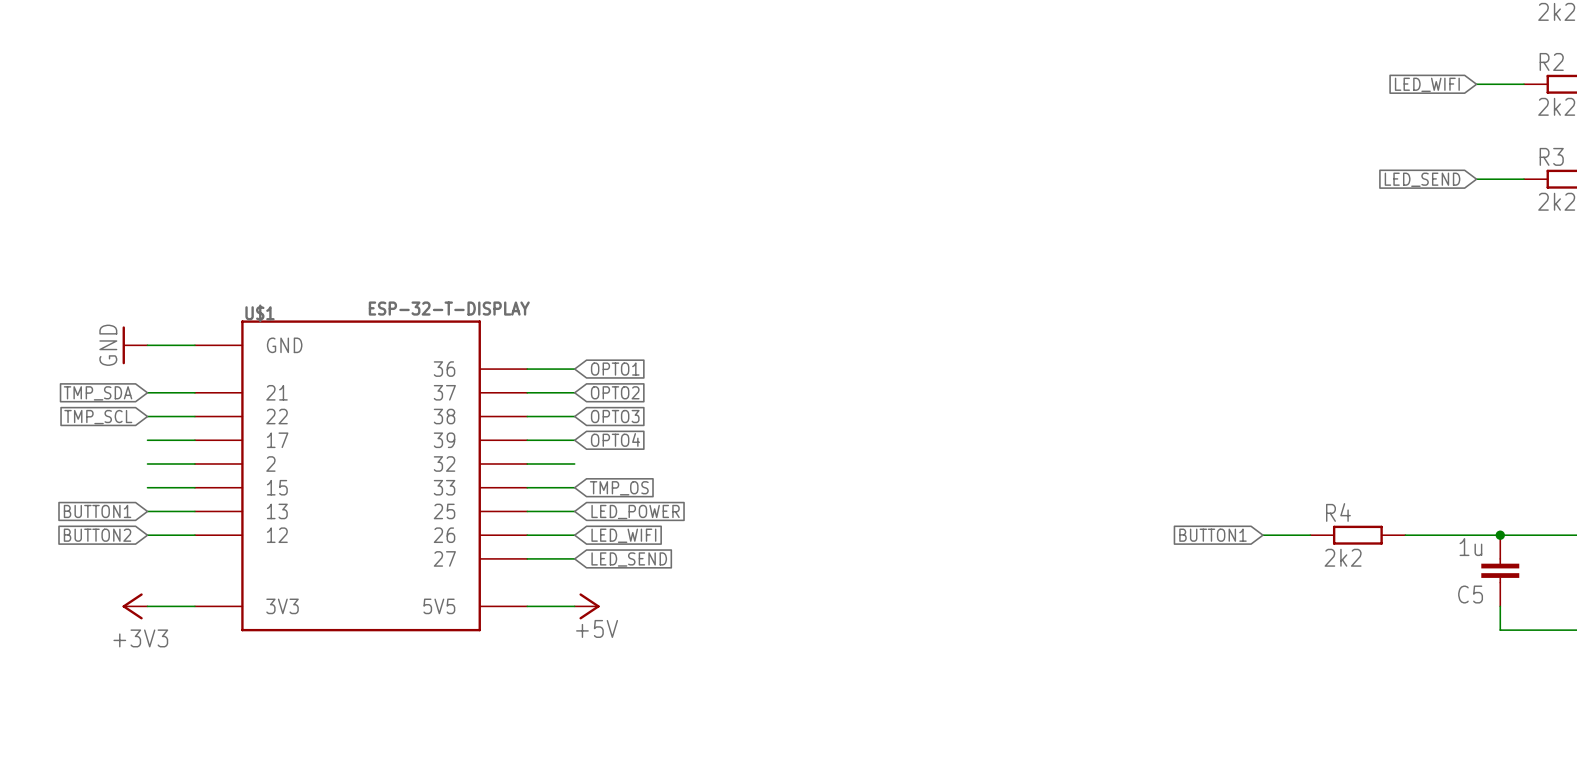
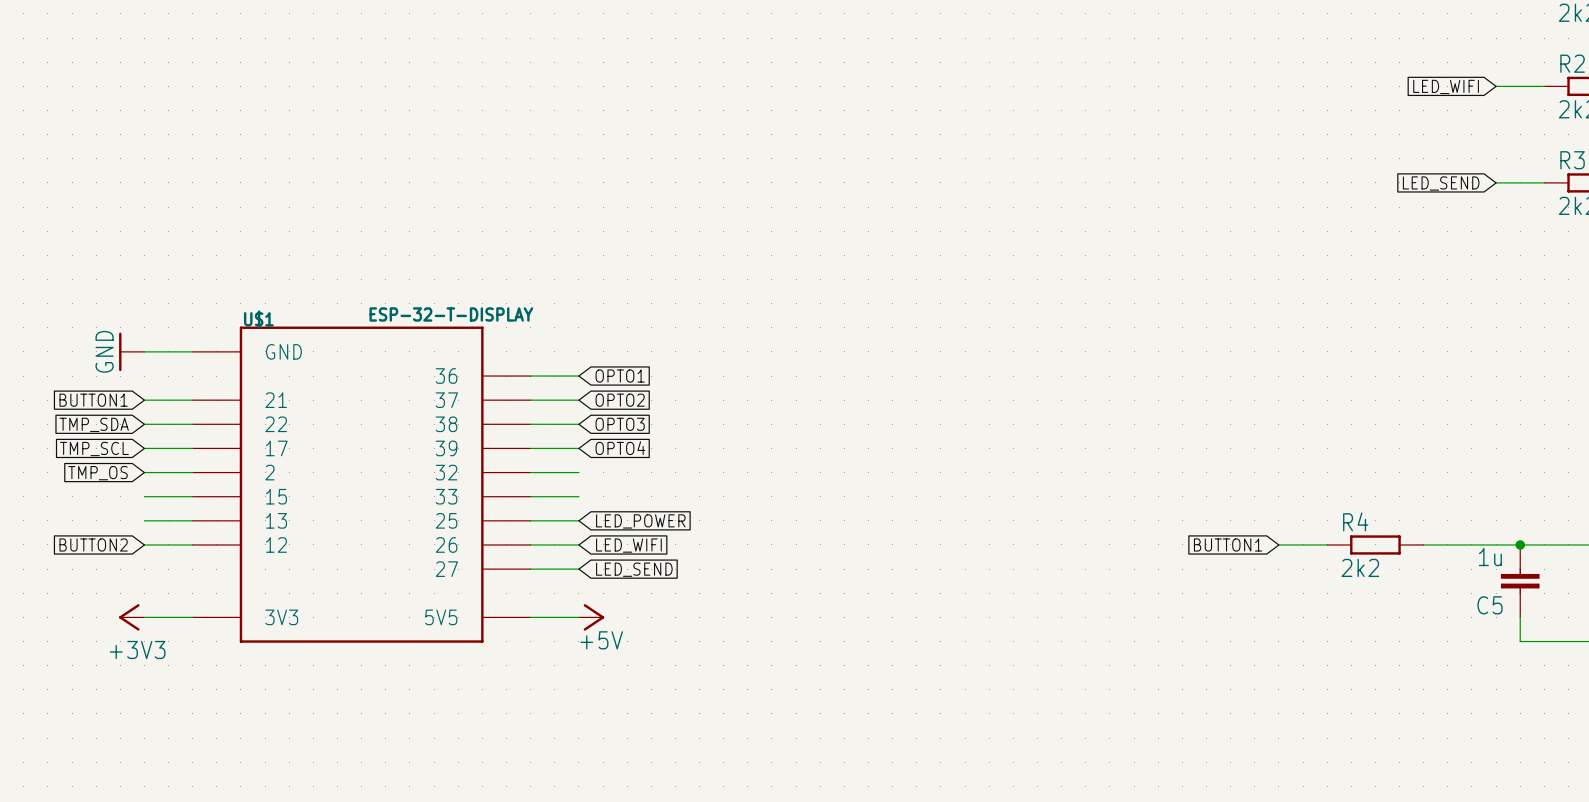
global label: TMP_SDA (98, 393) -> BUTTON1 (93, 400)
global label: TMP_SCL (98, 417) -> TMP_SDA (94, 424)
global label: none -> TMP_SCL (94, 449)
global label: none -> TMP_OS (98, 473)
global label: TMP_OS (619, 488) -> none
global label: BUTTON1 (97, 511) -> none

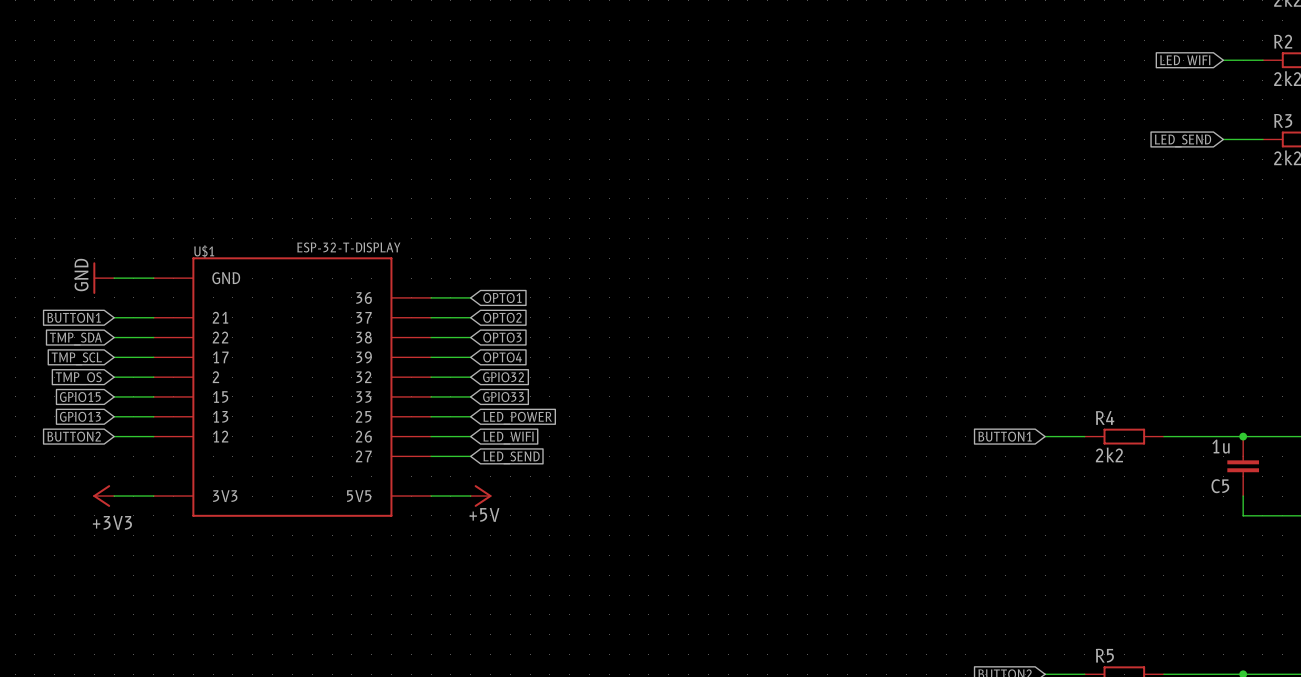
global label: none -> GPIO32 (503, 377)
global label: none -> GPIO15 (80, 397)
global label: none -> GPIO33 (503, 397)
global label: none -> GPIO13 (80, 416)

